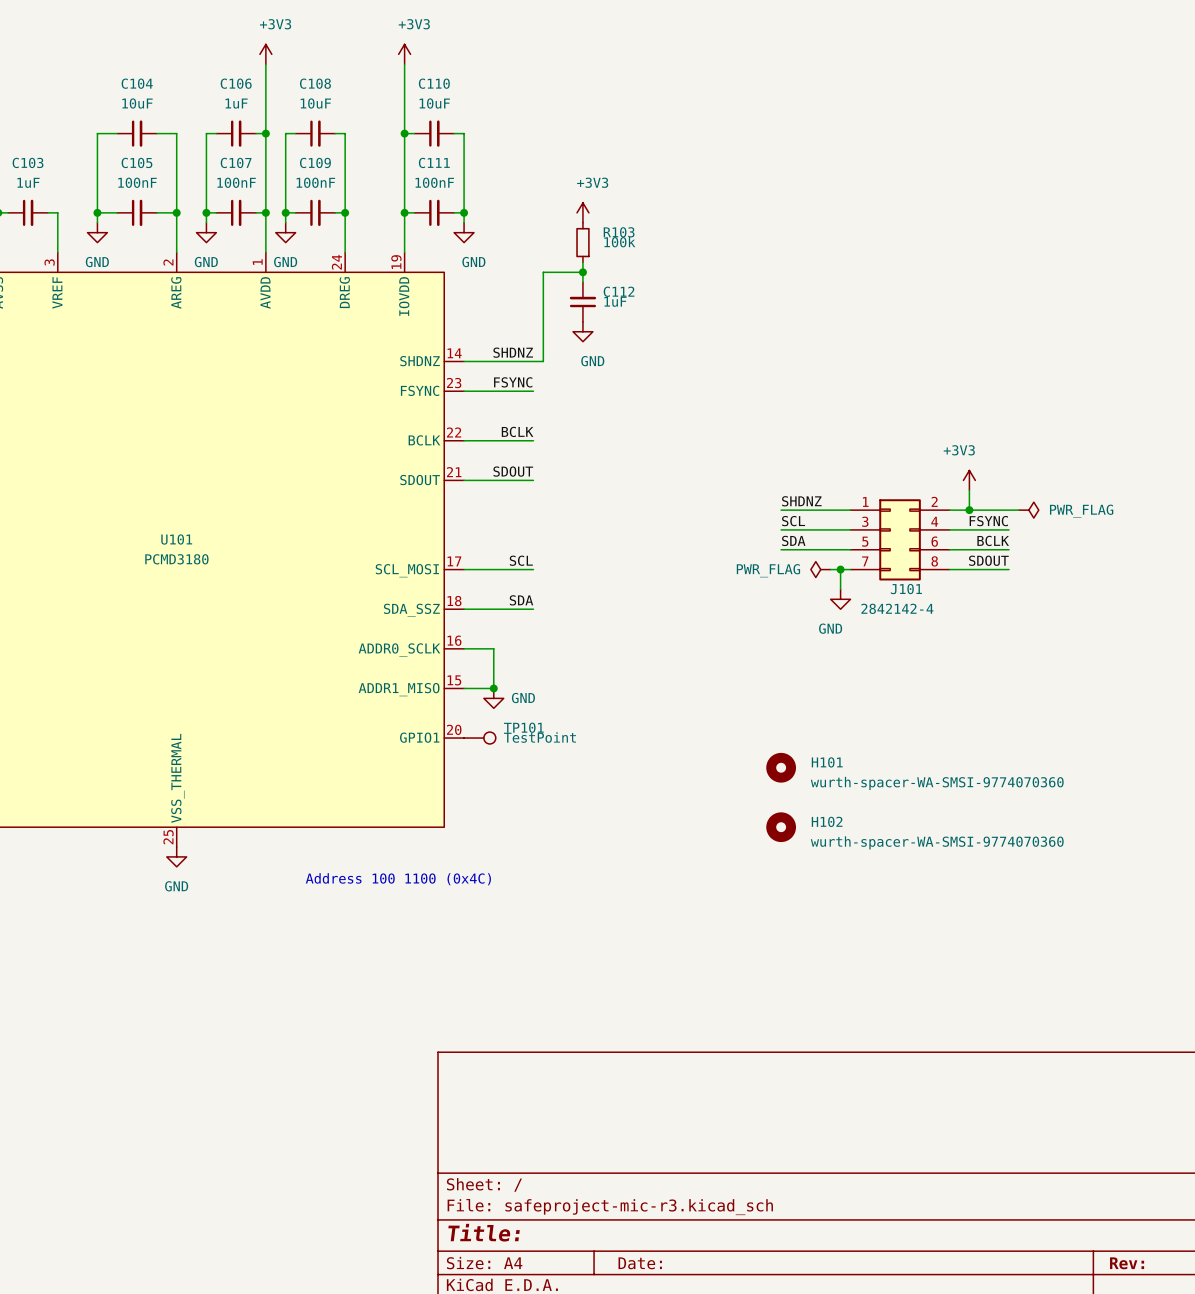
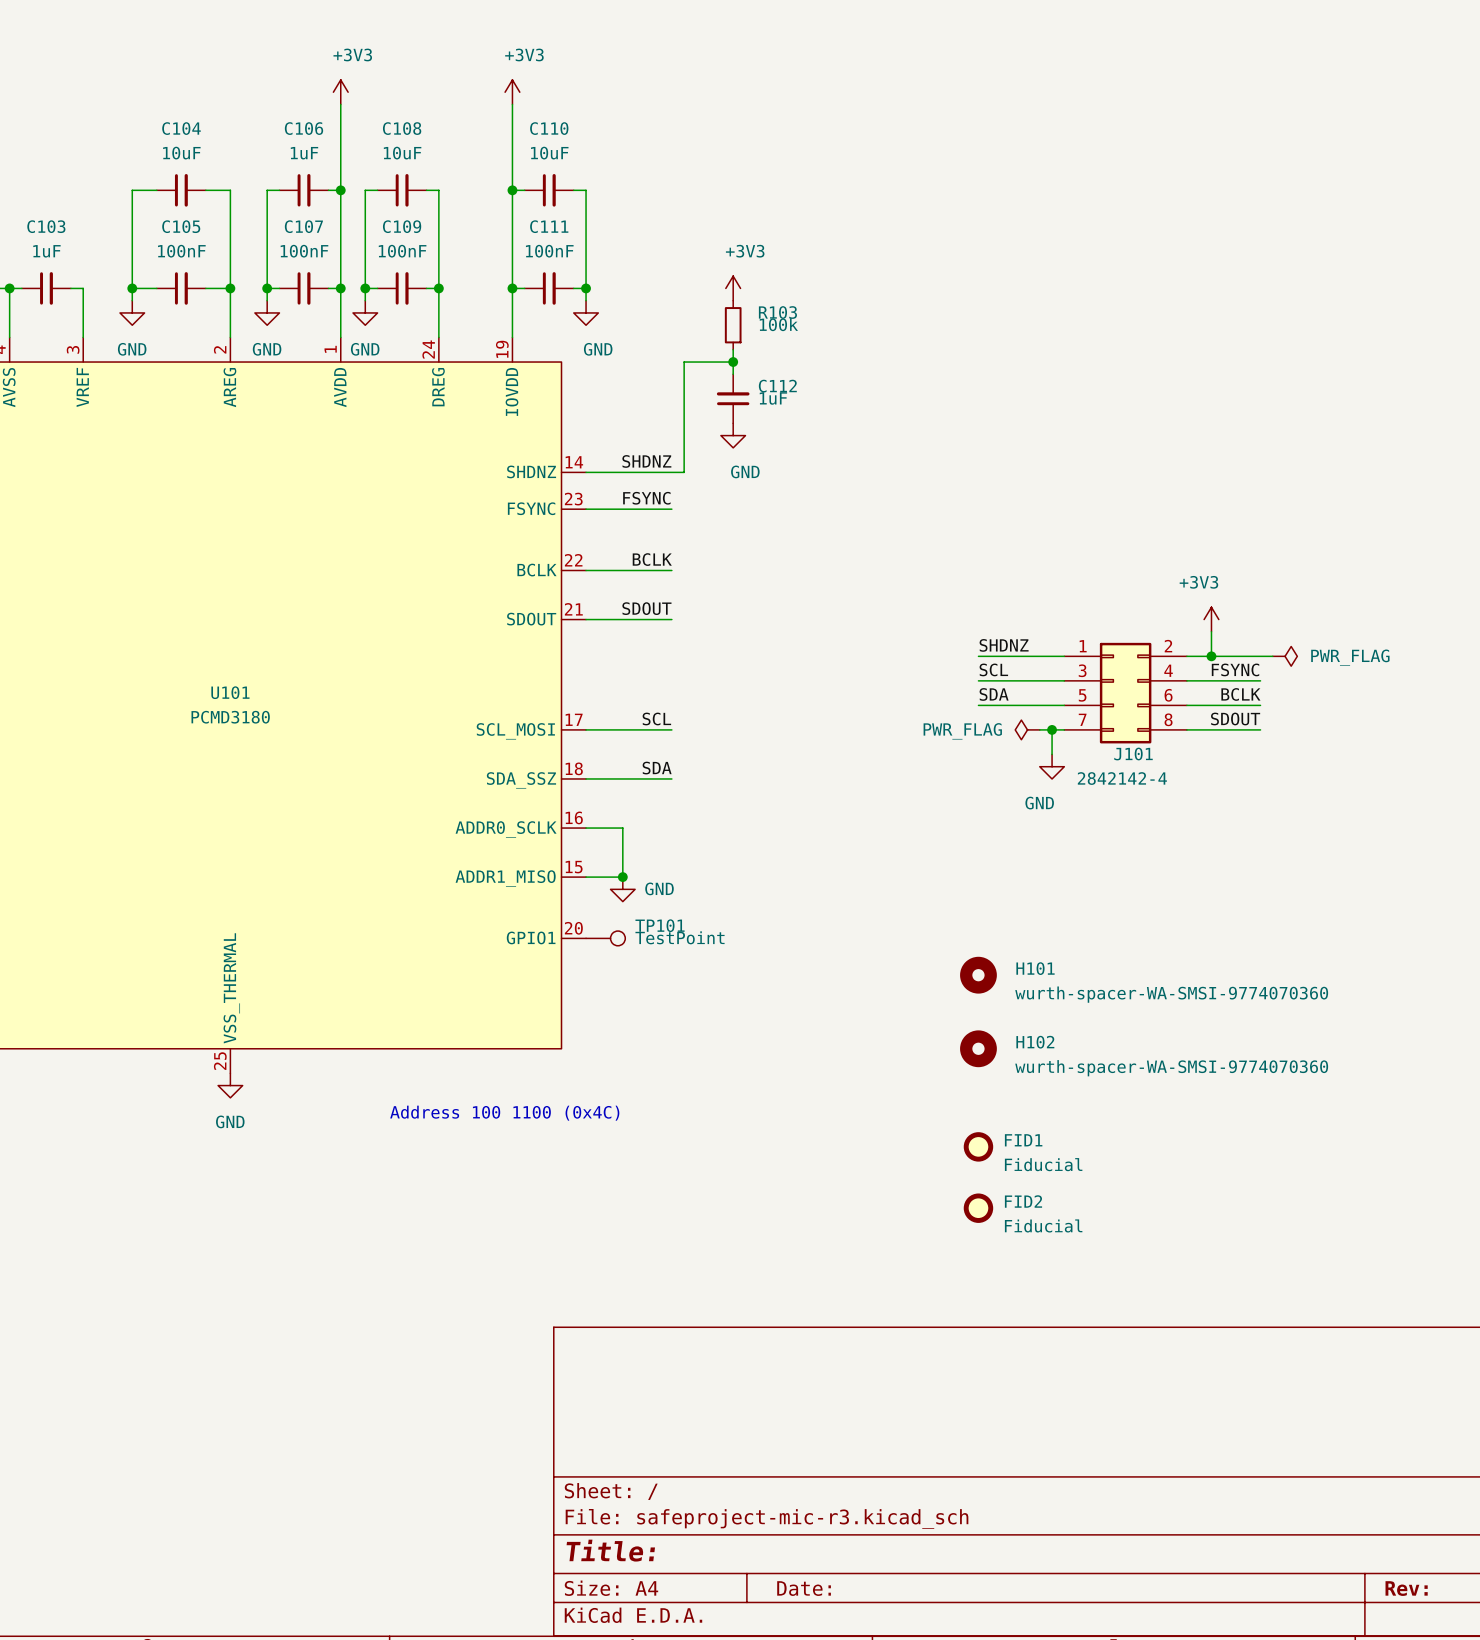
FID1: none -> Fiducial (978, 1146)
FID2: none -> Fiducial (978, 1208)

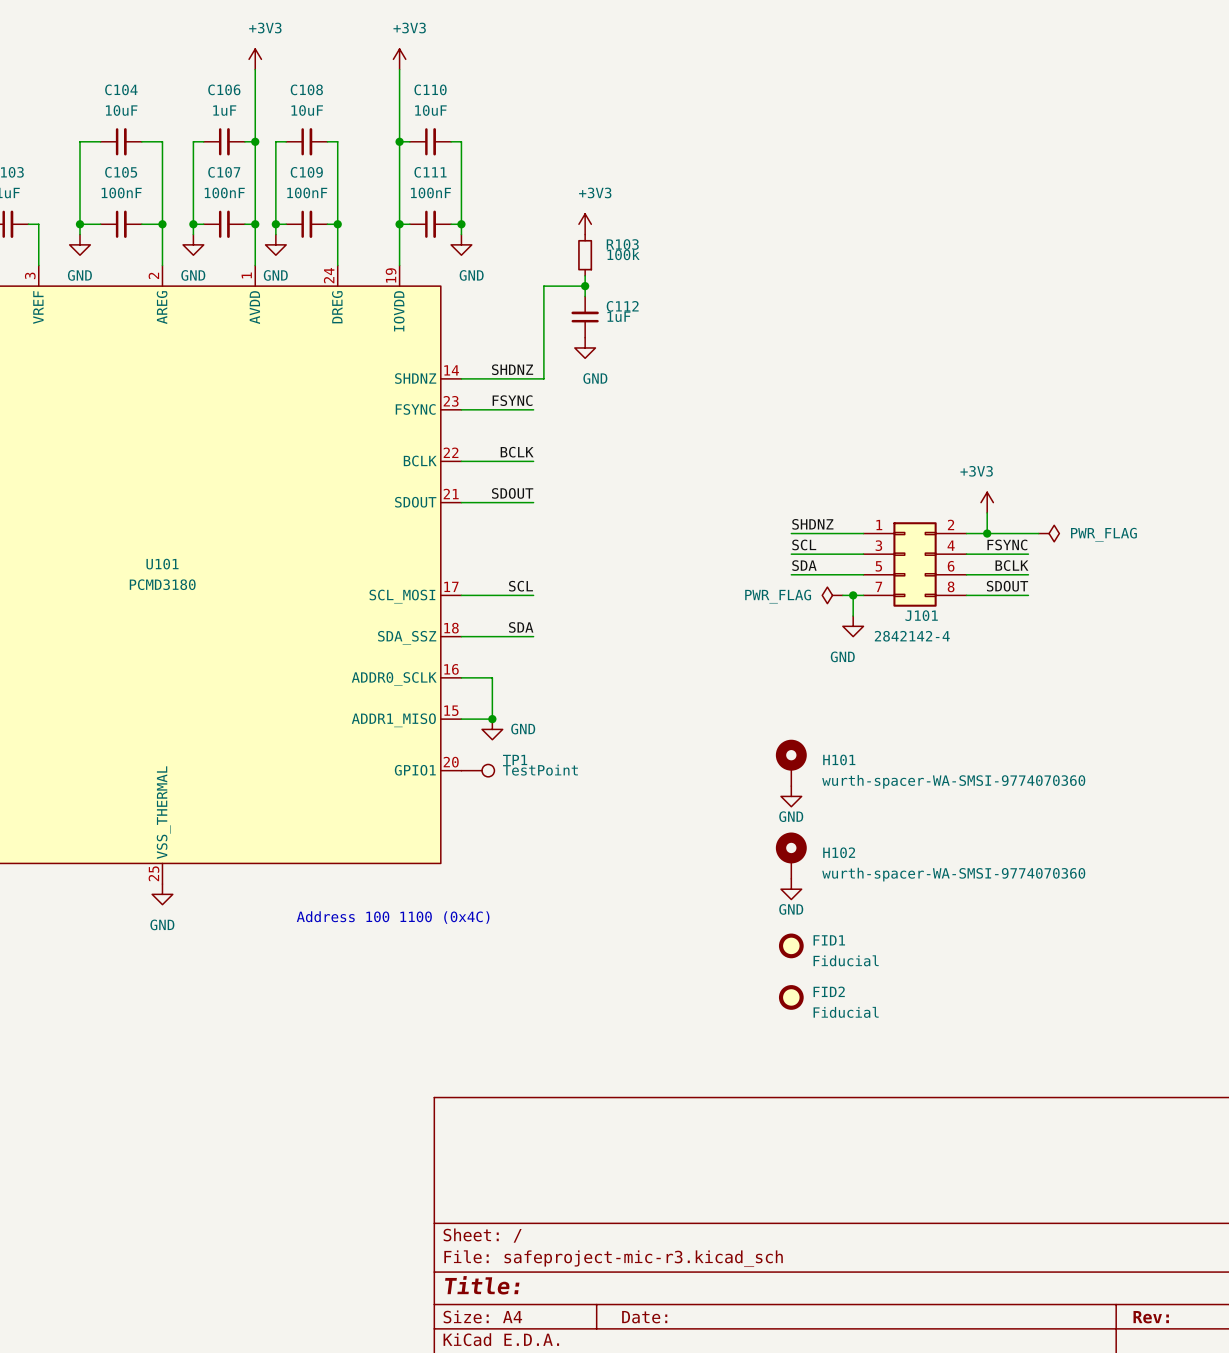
TP101 name: TP101 (660, 925) -> TP1 (515, 759)
H101 symbol: [960, 956, 997, 994] -> [775, 739, 807, 787]
power symbol: none -> GND (791, 796)
H102 symbol: [960, 1030, 997, 1068] -> [775, 832, 807, 879]
power symbol: none -> GND (791, 889)

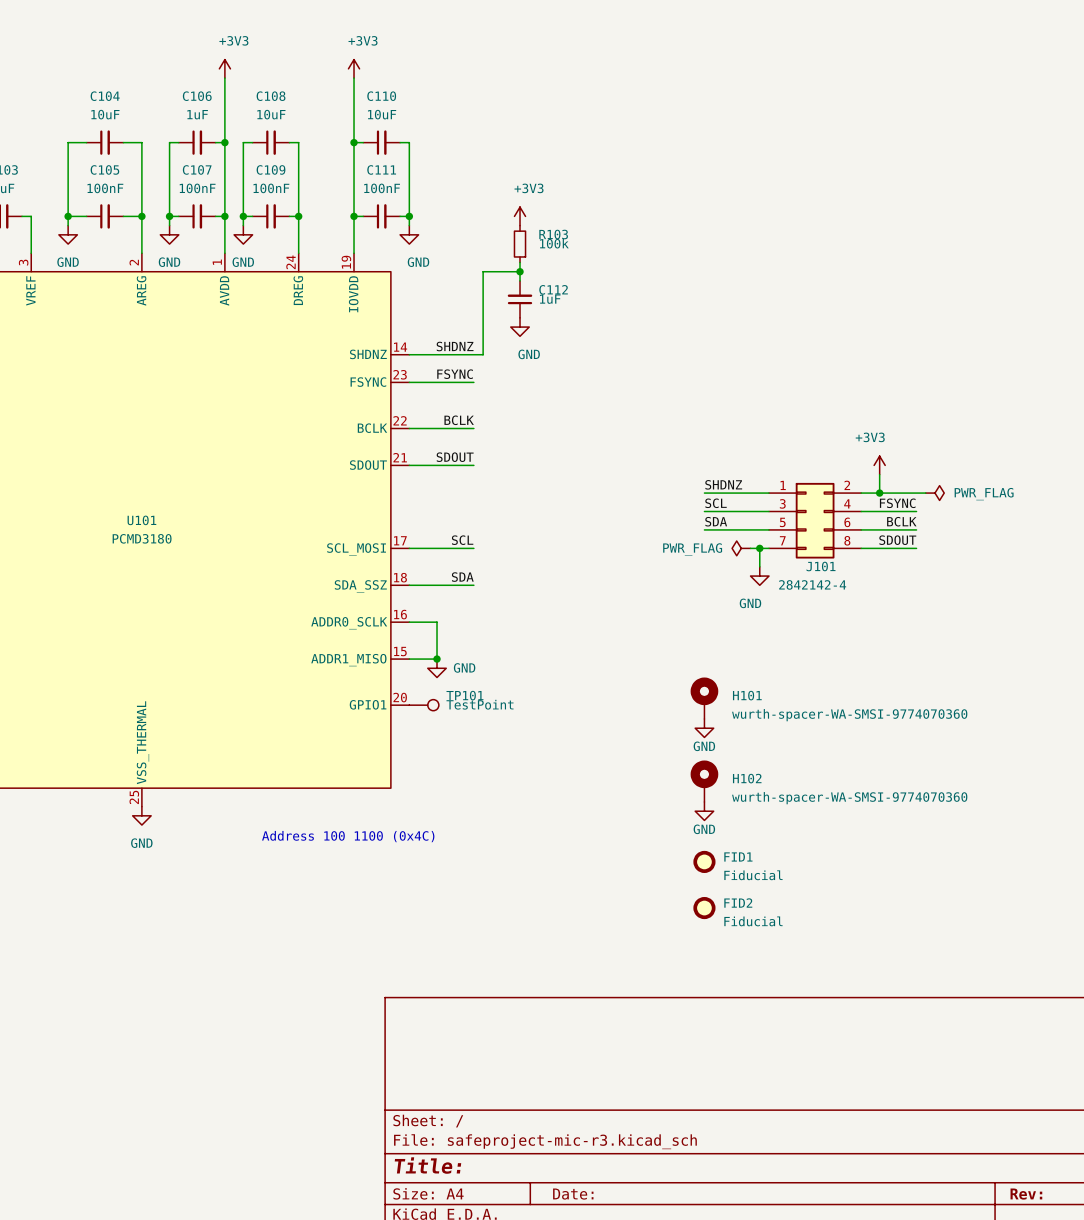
TP1 name: TP1 (515, 759) -> TP101 (464, 695)

